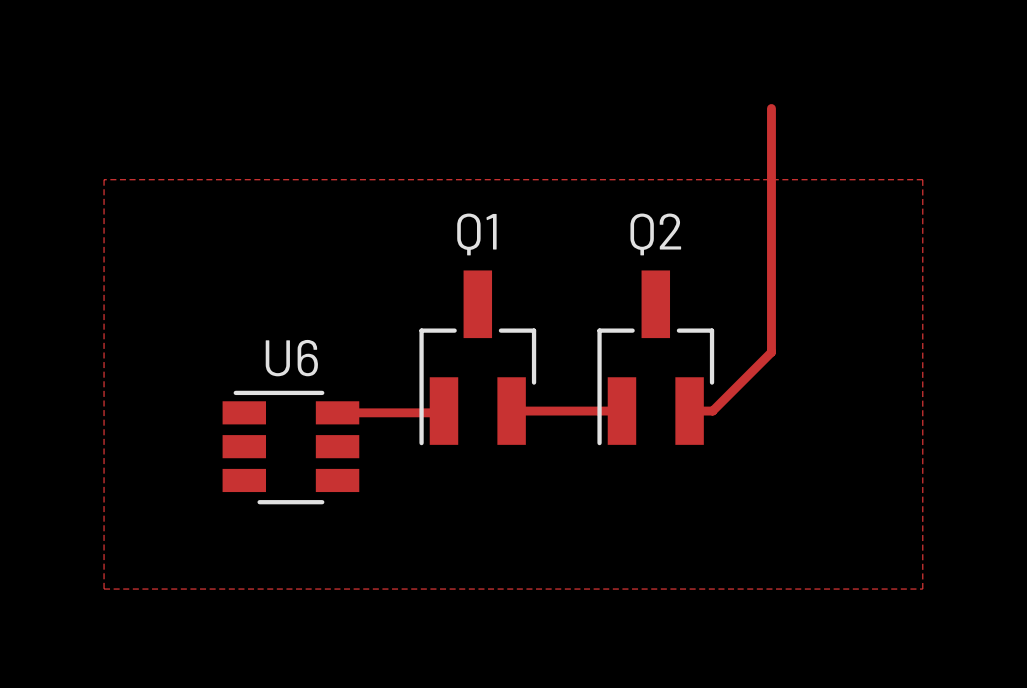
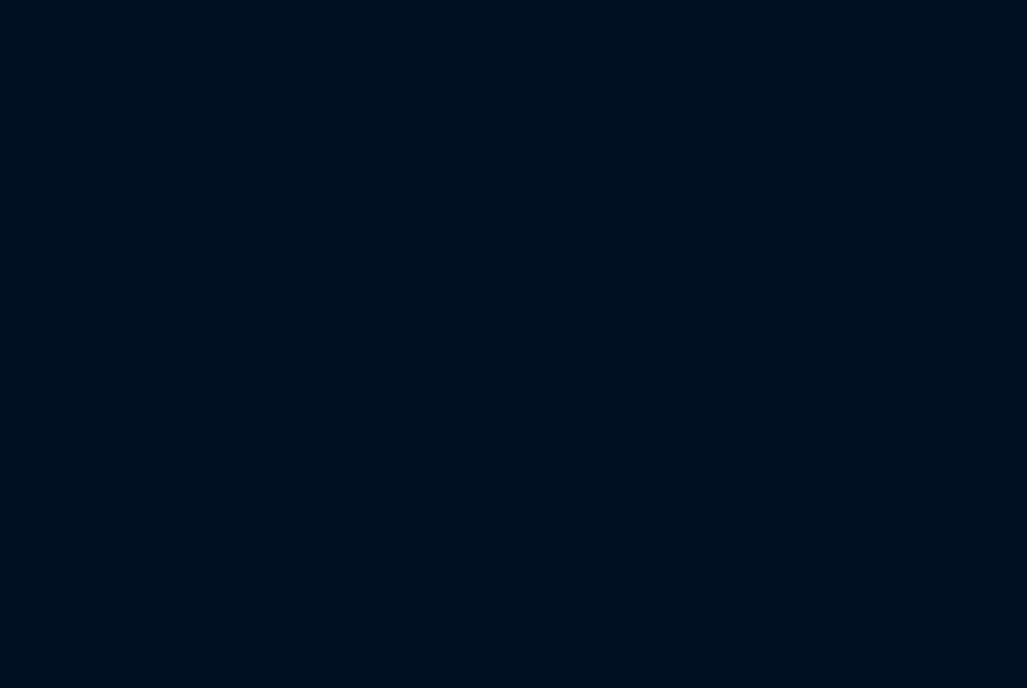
top track: (771, 108) (771, 352) (712, 411) (689, 411) -> none
top zone outline: (104, 179) (104, 589) (922, 589) (922, 179) (104, 179) -> none
Q1: (477, 357) -> none
Q2: (655, 357) -> none
top track: (443, 411) (442, 412) (337, 412) -> none
top track: (511, 411) (621, 411) -> none
U6: (290, 447) -> none

